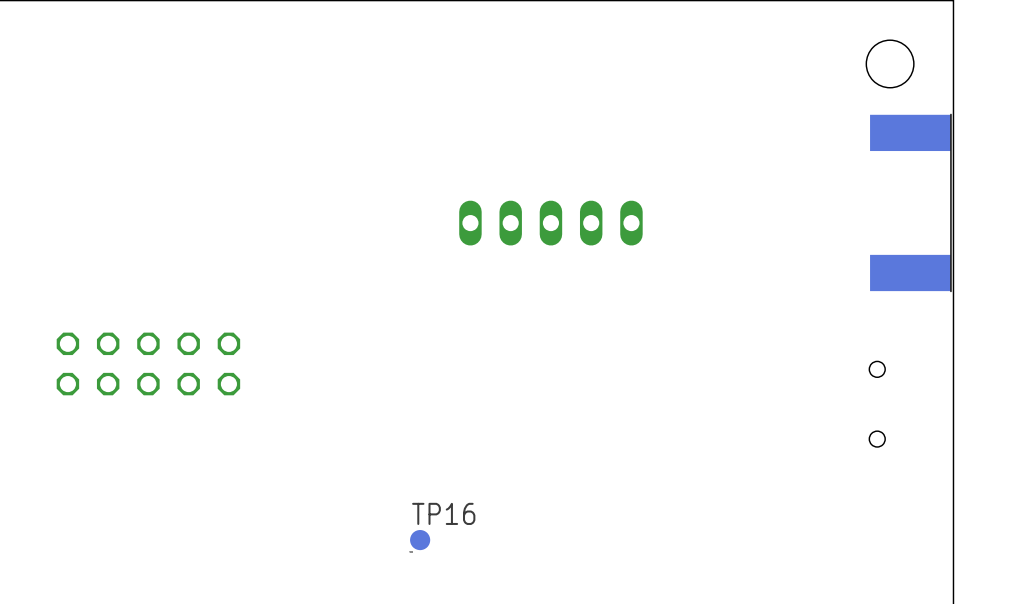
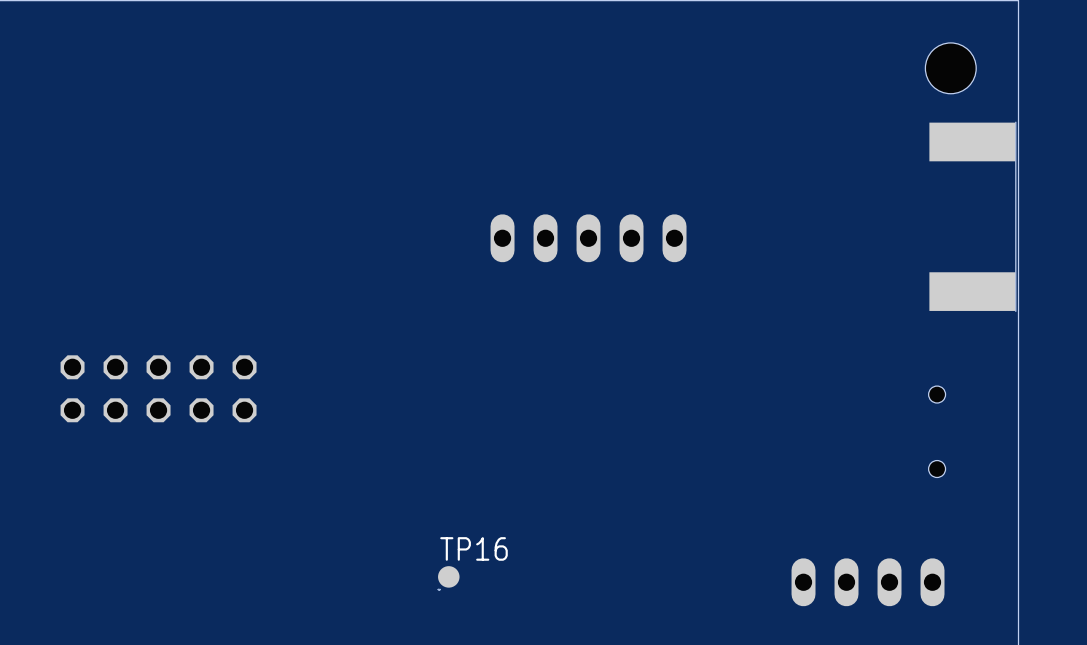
part: none -> (868, 582)

